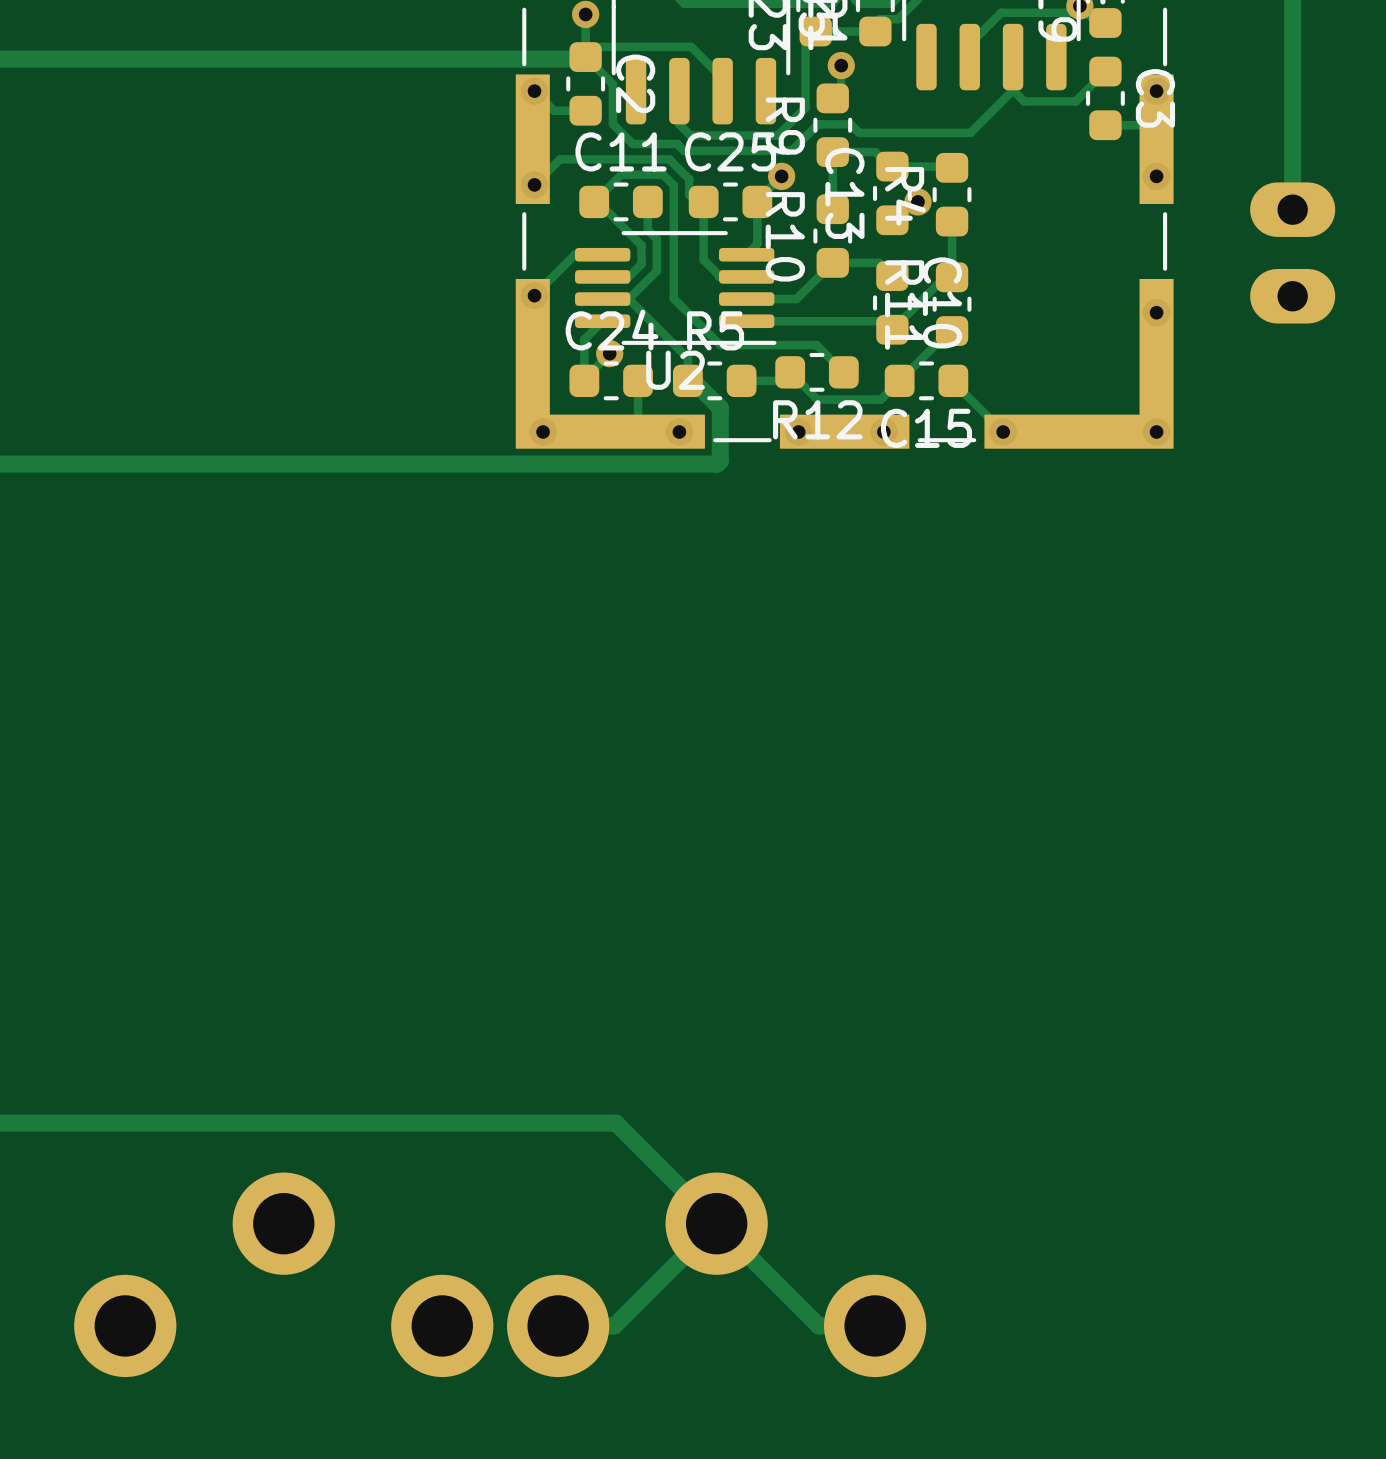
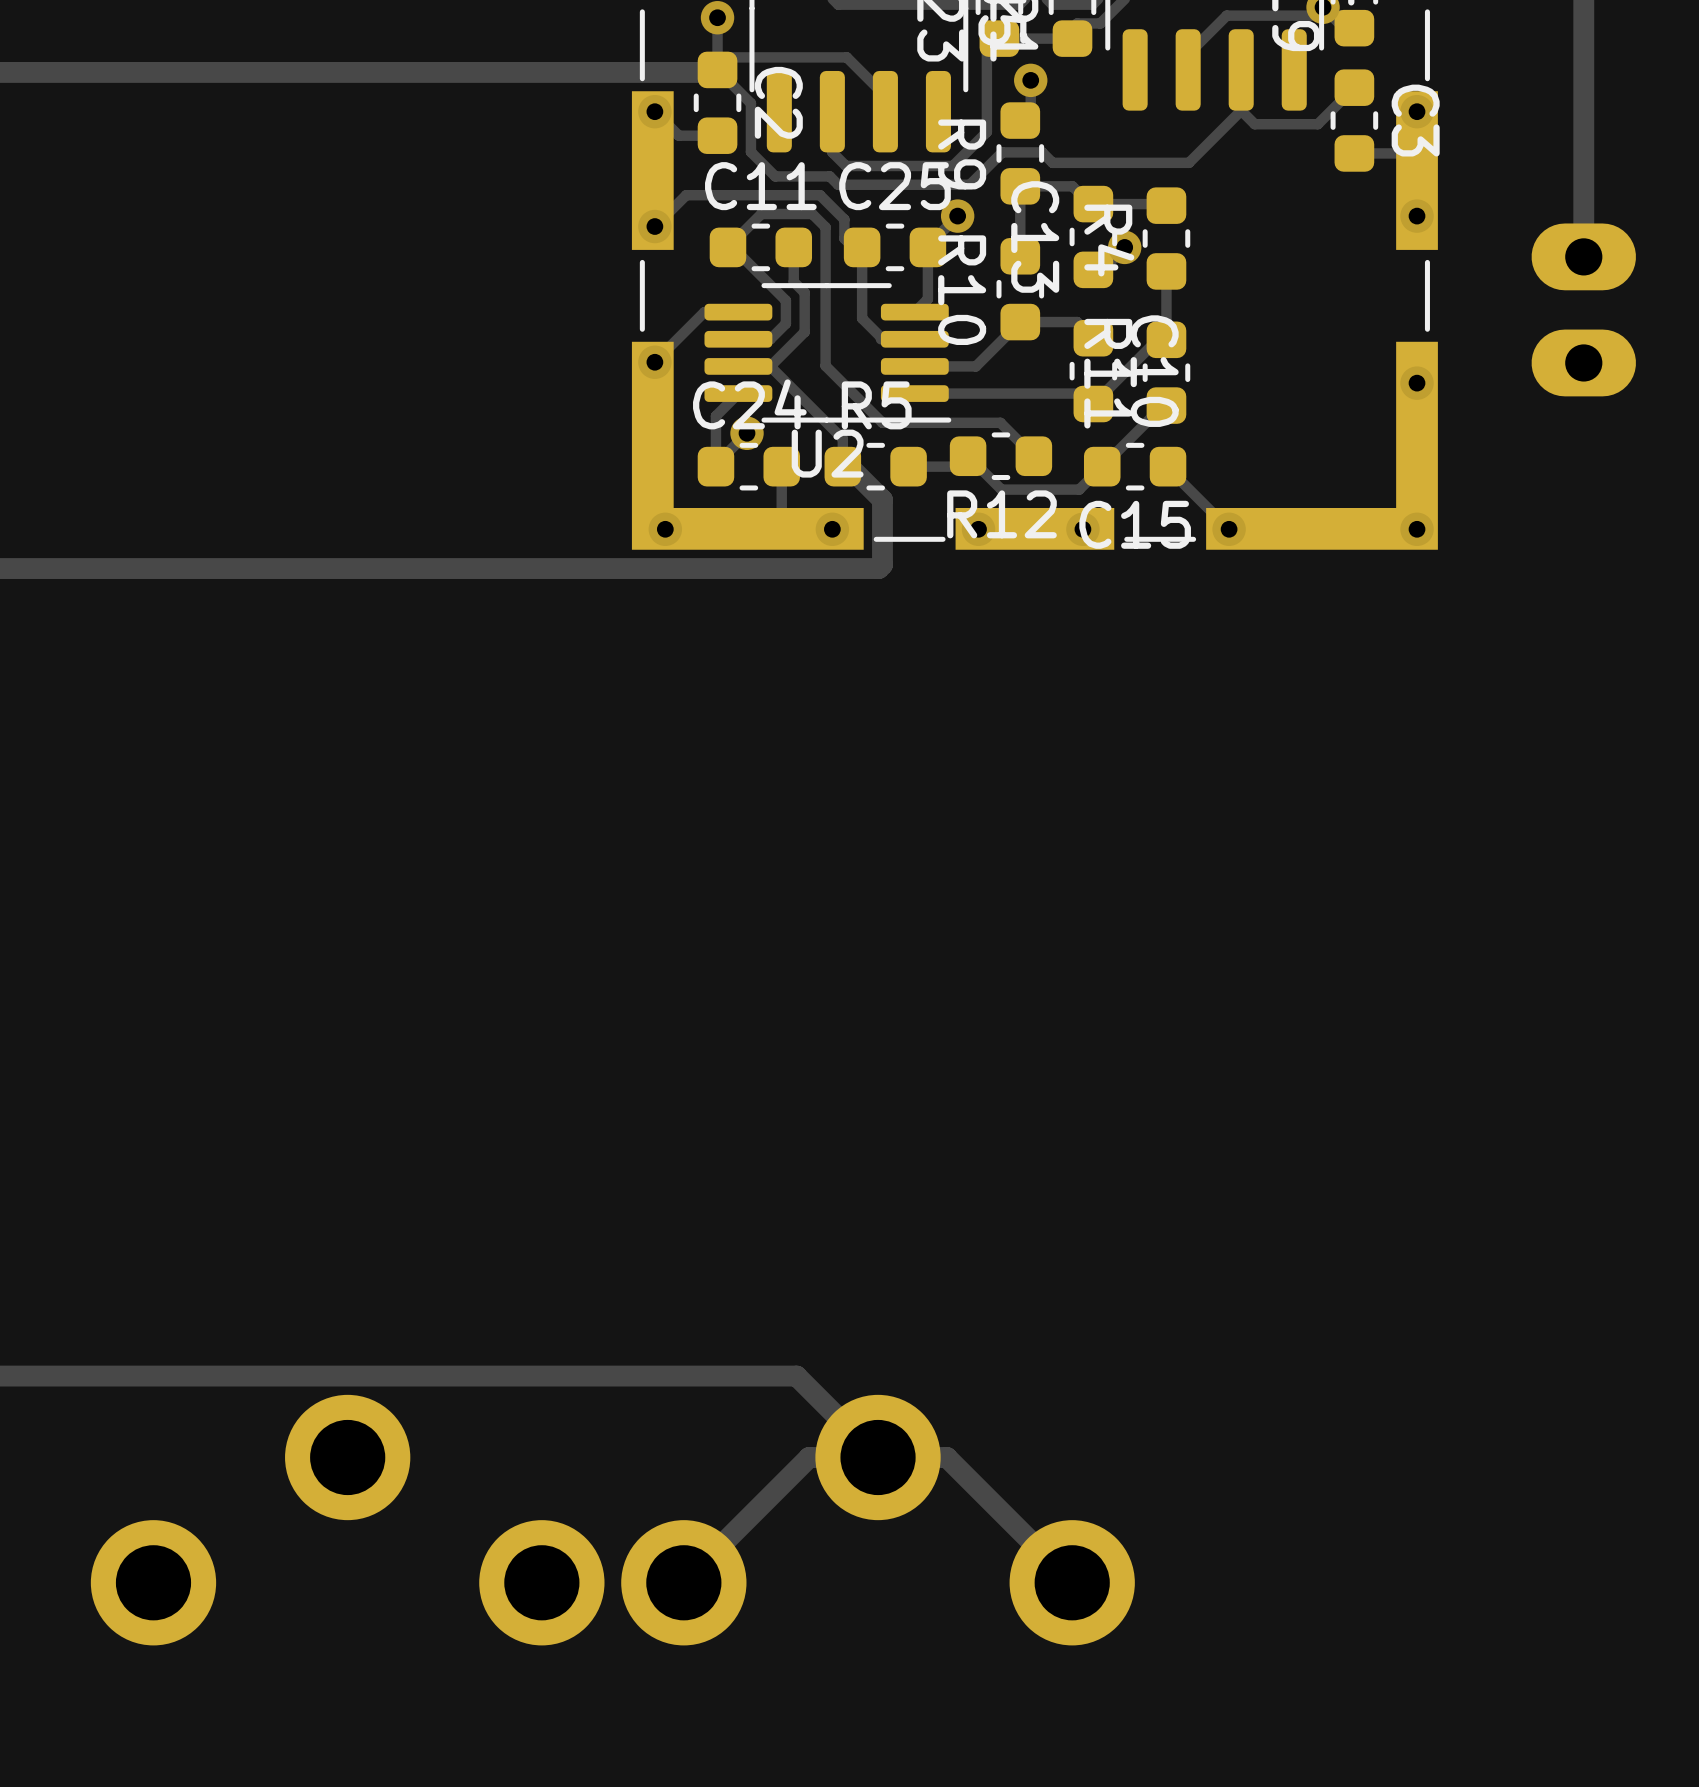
track: (616, 1123) (818, 1325) (875, 1325) -> (754, 1376) (796, 1376) (878, 1457)
track: (716, 1223) (614, 1325) (558, 1325) -> none
part position: (500, 1274) -> (612, 1520)
track: none -> (1072, 1582) (946, 1457) (809, 1457) (683, 1582)

